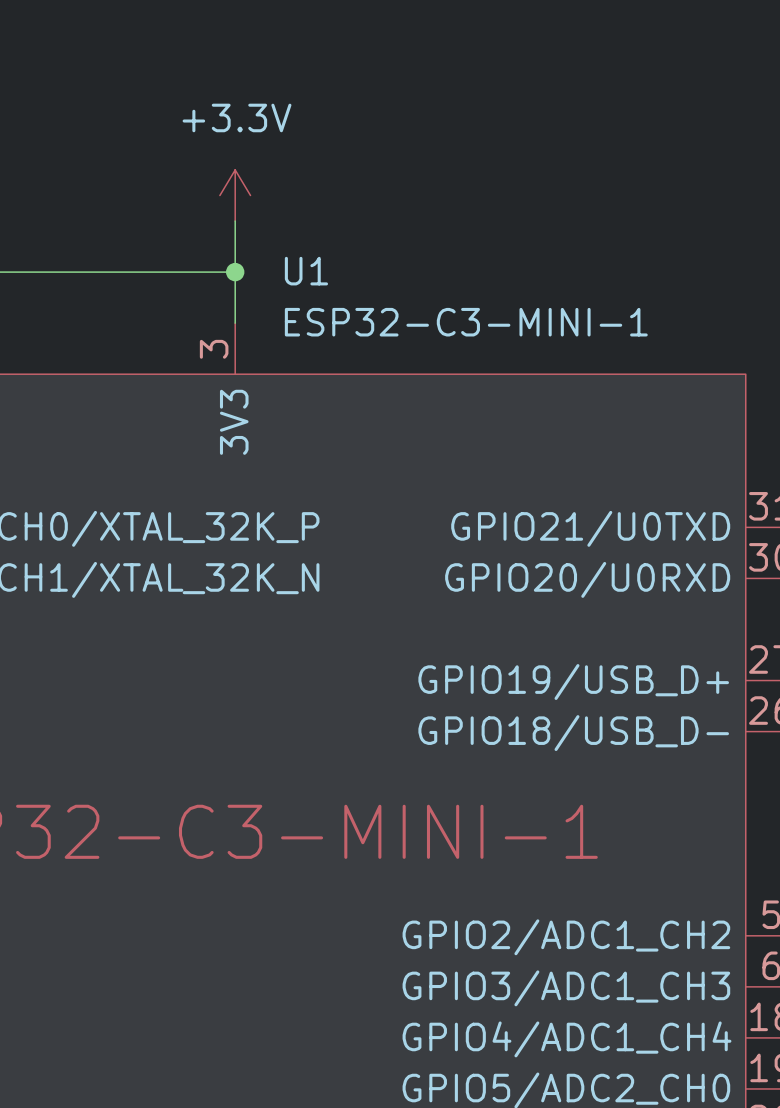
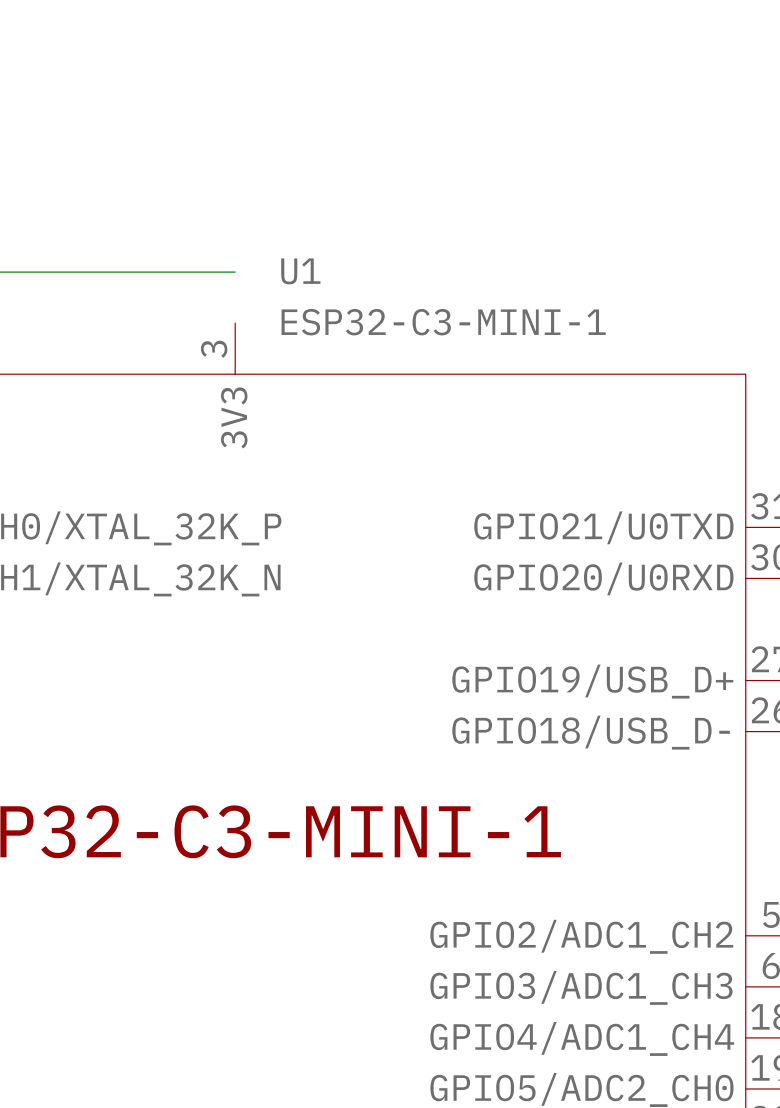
power symbol: +3.3V (235, 195) -> none
wire: (235, 221) (235, 323) -> none
junction: (235, 272) -> none

